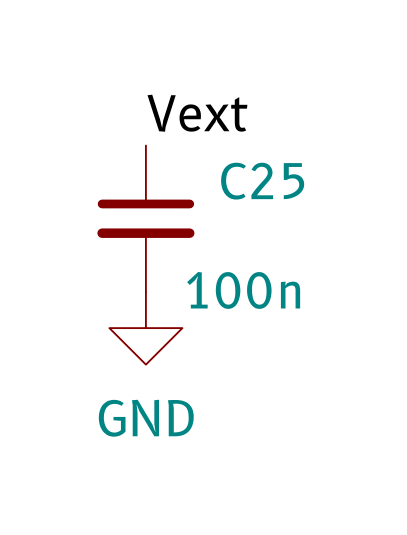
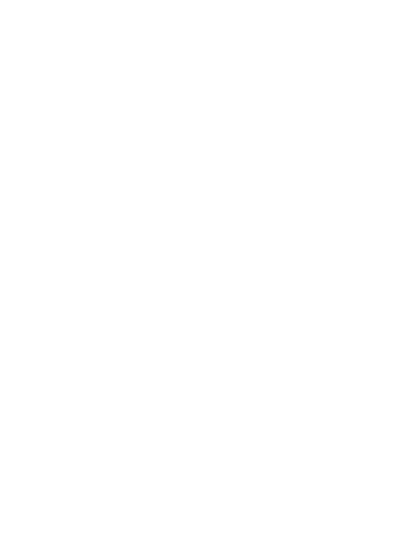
label: Vext (197, 113) -> none
C25: 100n (145, 218) -> none
power symbol: GND (145, 328) -> none

